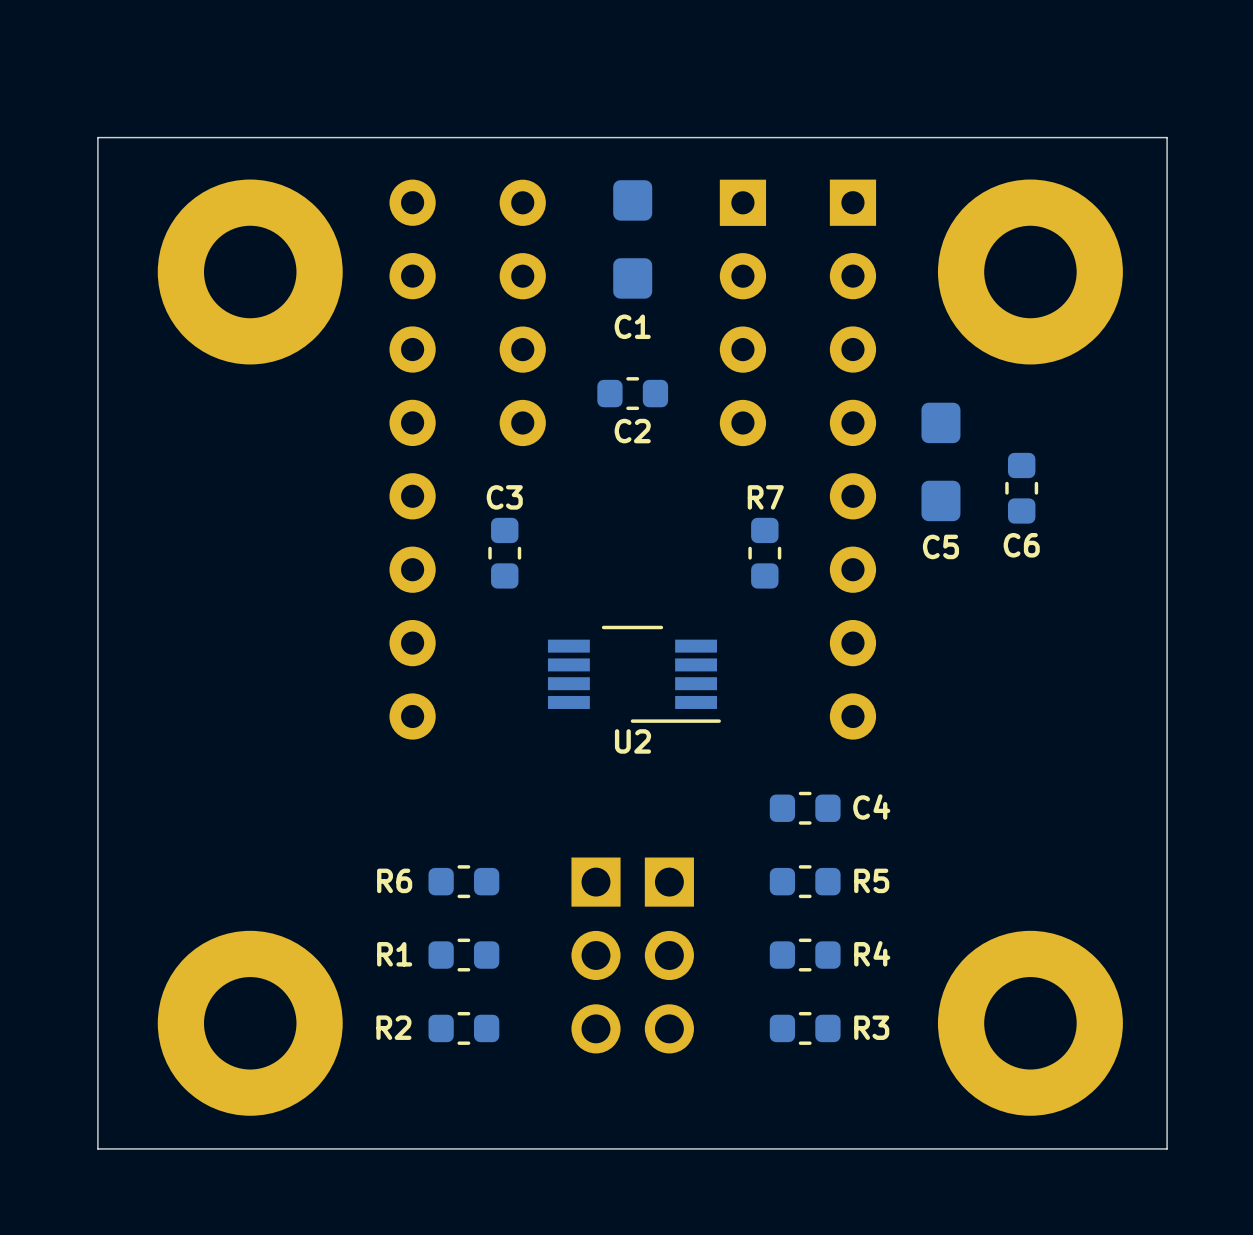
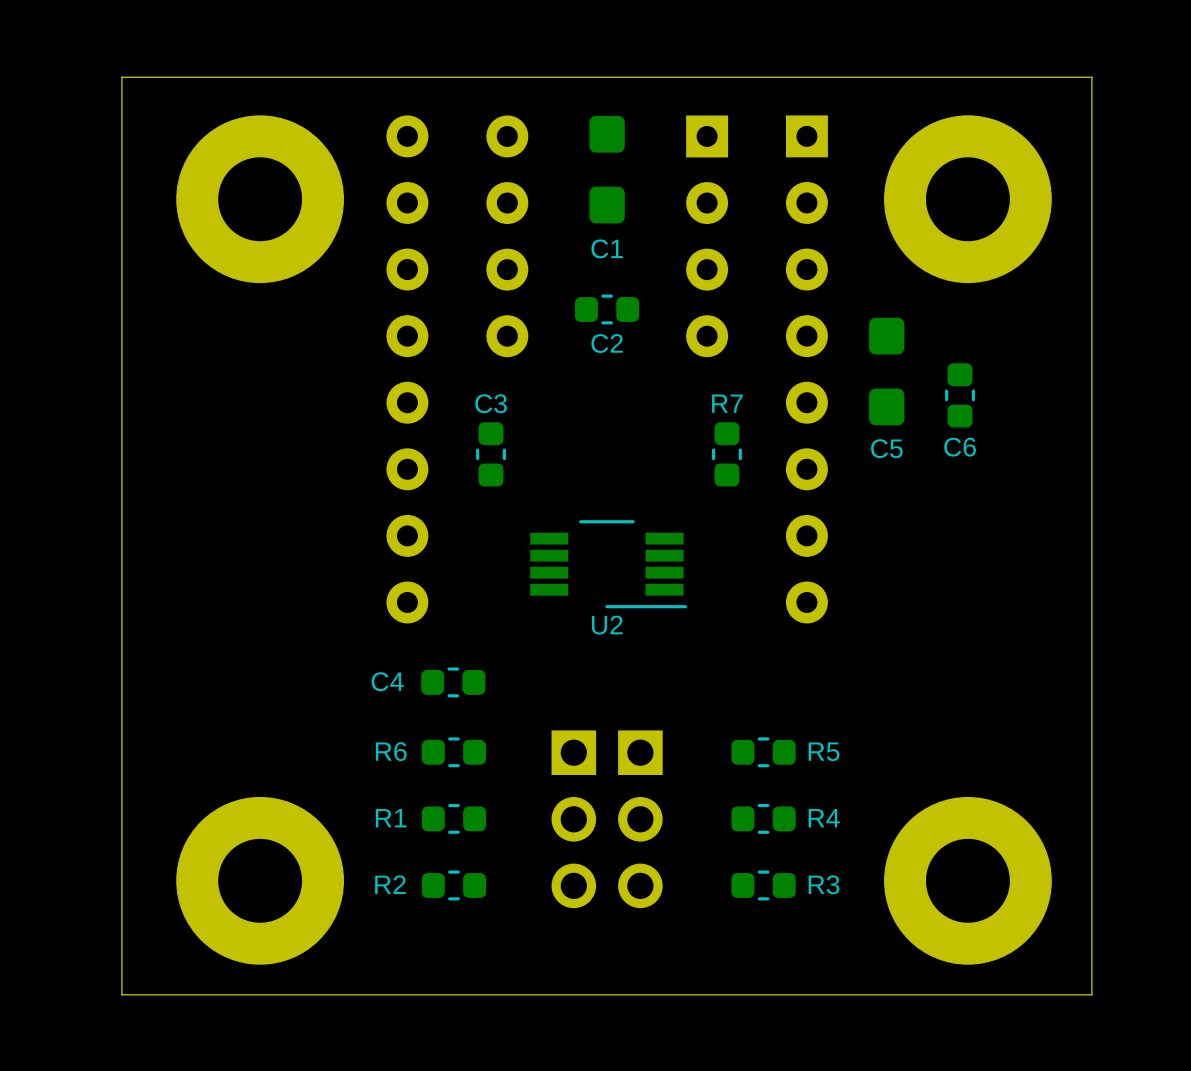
C4 name position: C4 (871, 807) -> C4 (387, 681)
C4 position: (805, 808) -> (453, 682)

